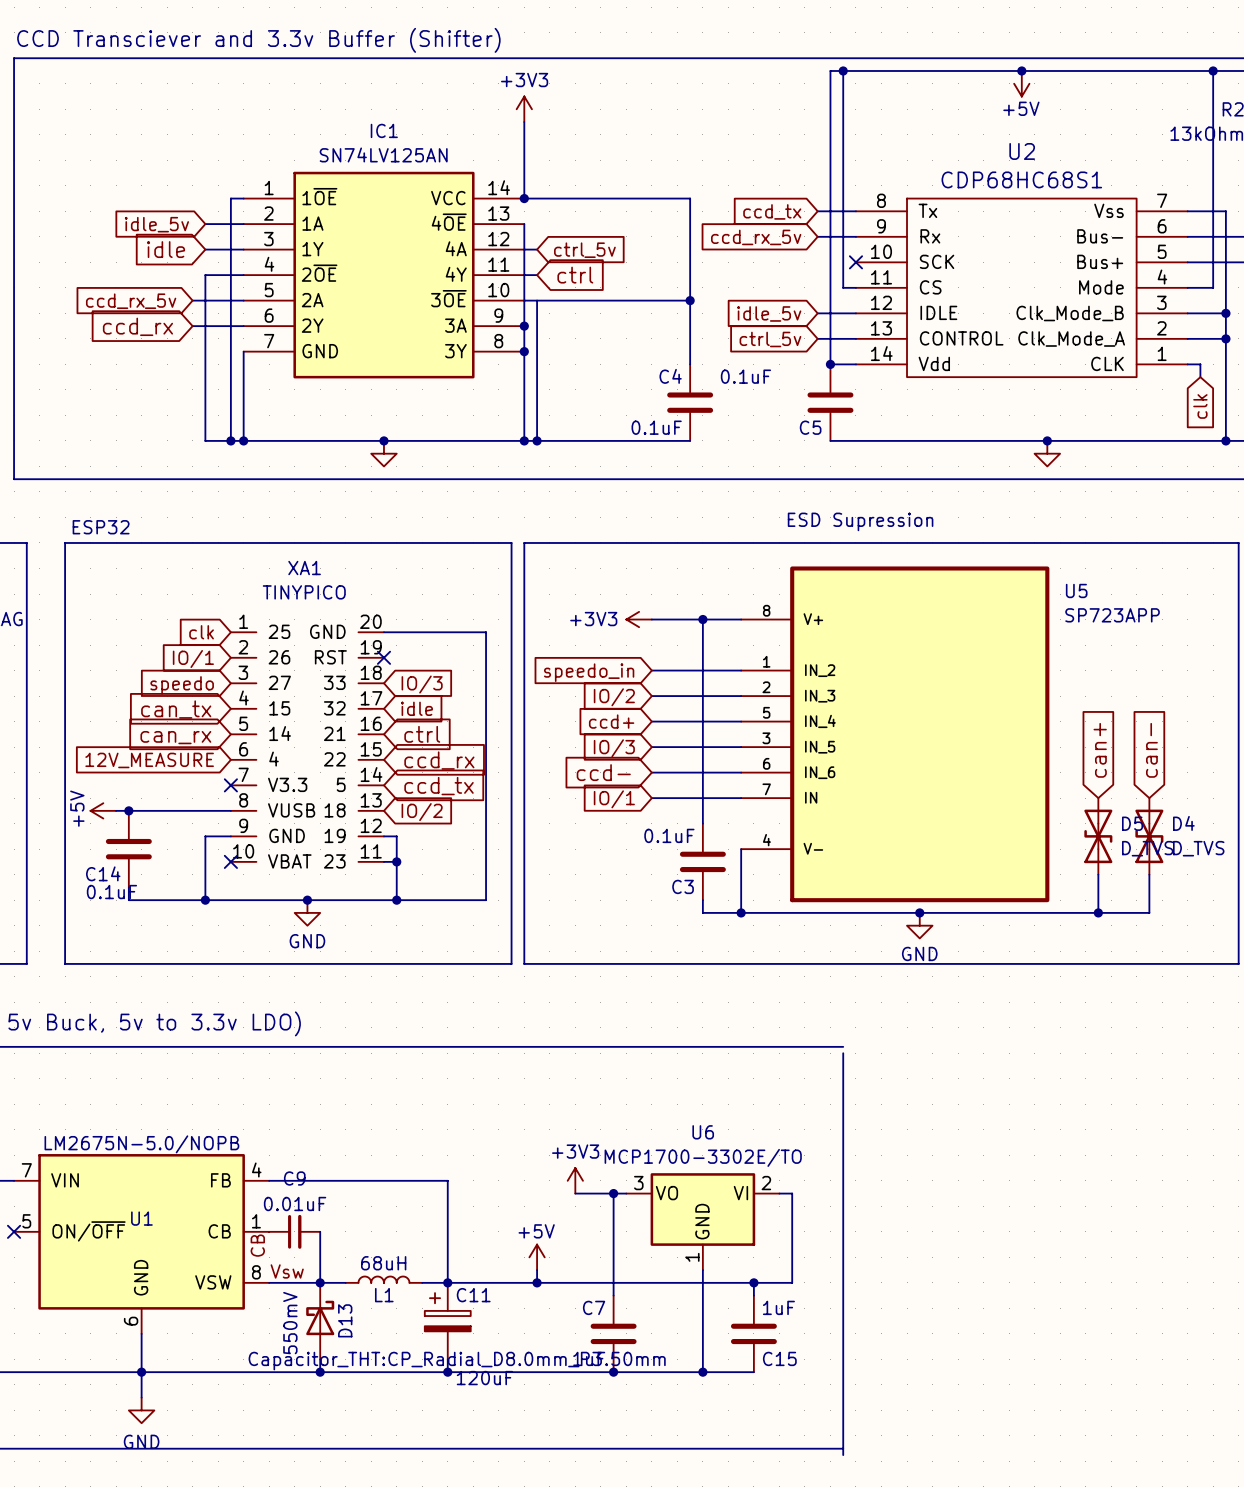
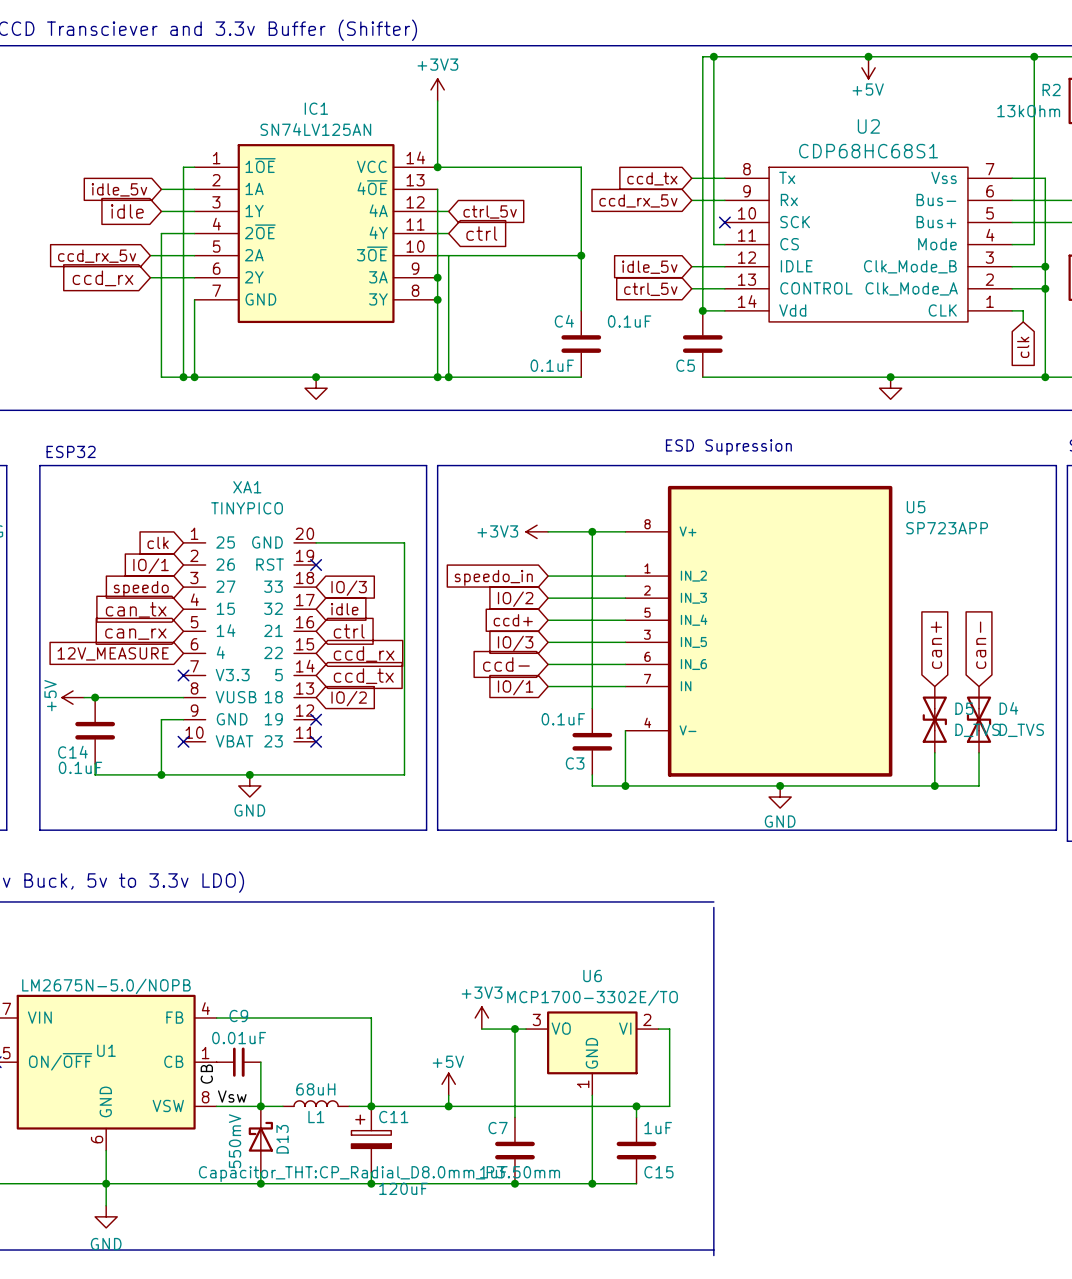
wire: (383, 836) (396, 836) (396, 900) -> none
no-connect mark: none -> (316, 719)
wire: (383, 861) (396, 861) -> none
no-connect mark: none -> (316, 741)
junction: (396, 861) -> none
junction: (396, 900) -> none

